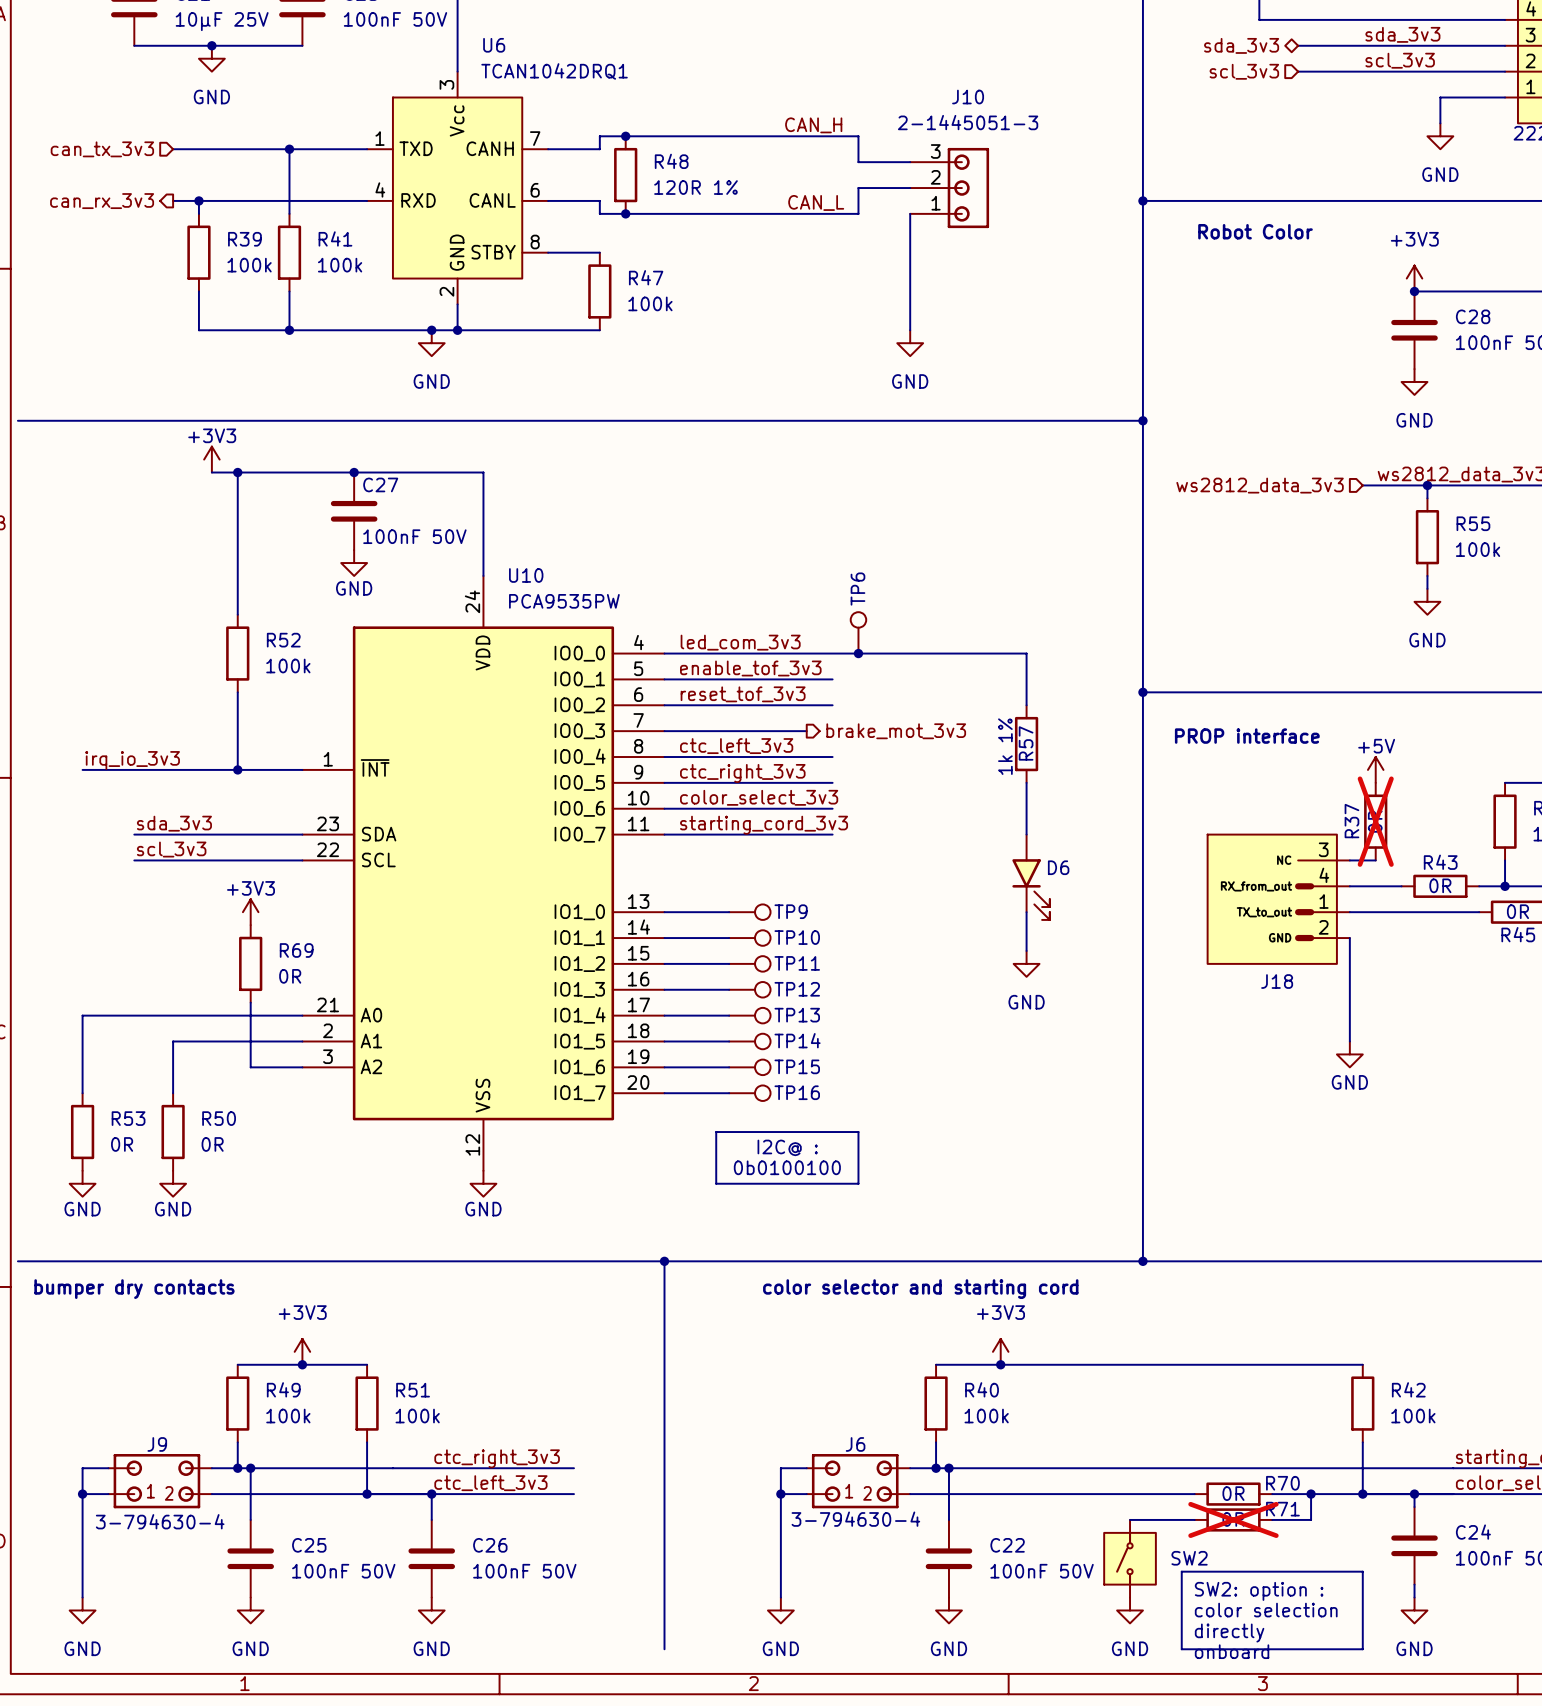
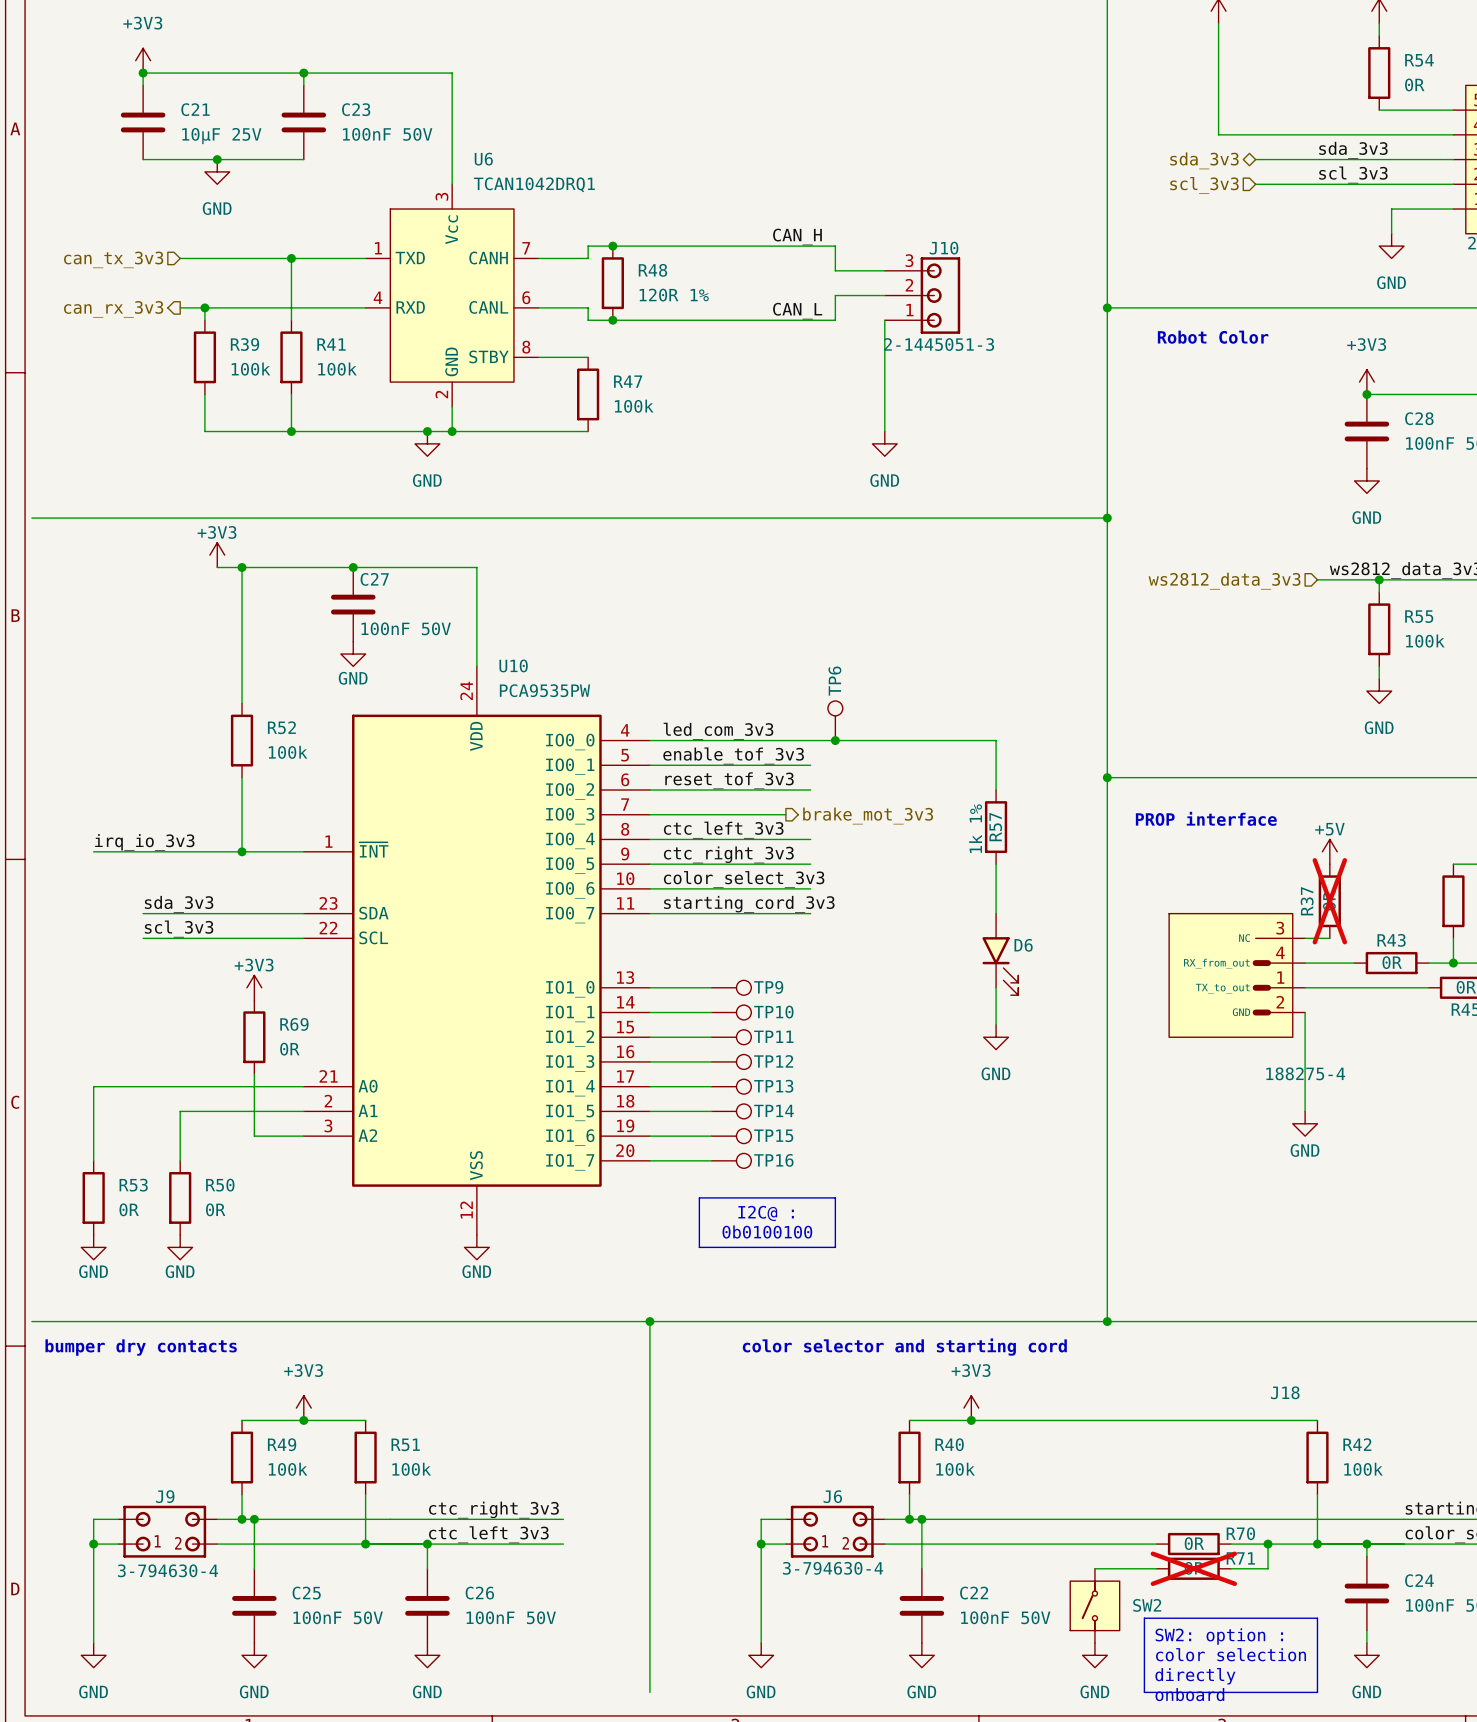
J10 name position: J10 (968, 97) -> J10 (944, 248)
J10 value position: 2-1445051-3 (968, 122) -> 2-1445051-3 (939, 344)
J18 name position: J18 (1277, 981) -> J18 (1285, 1392)
J18 value: none -> 188275-4 (1305, 1073)

